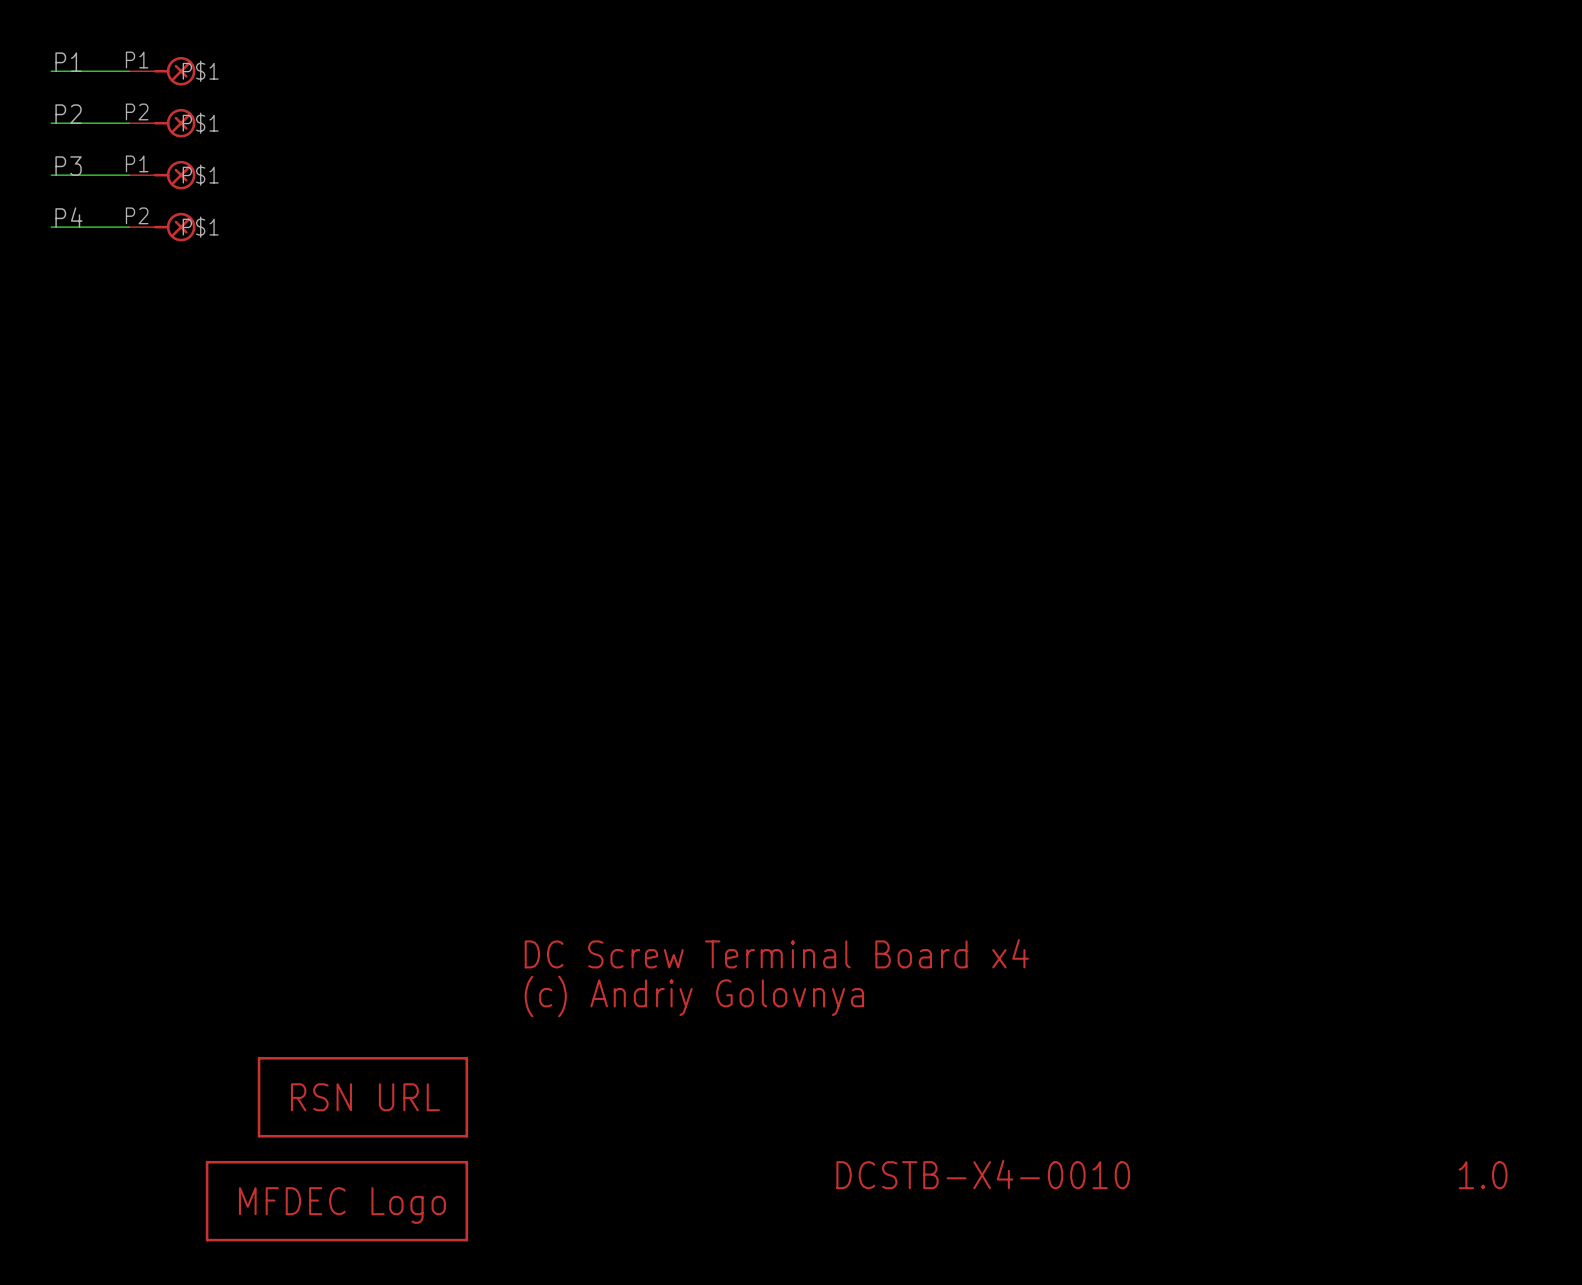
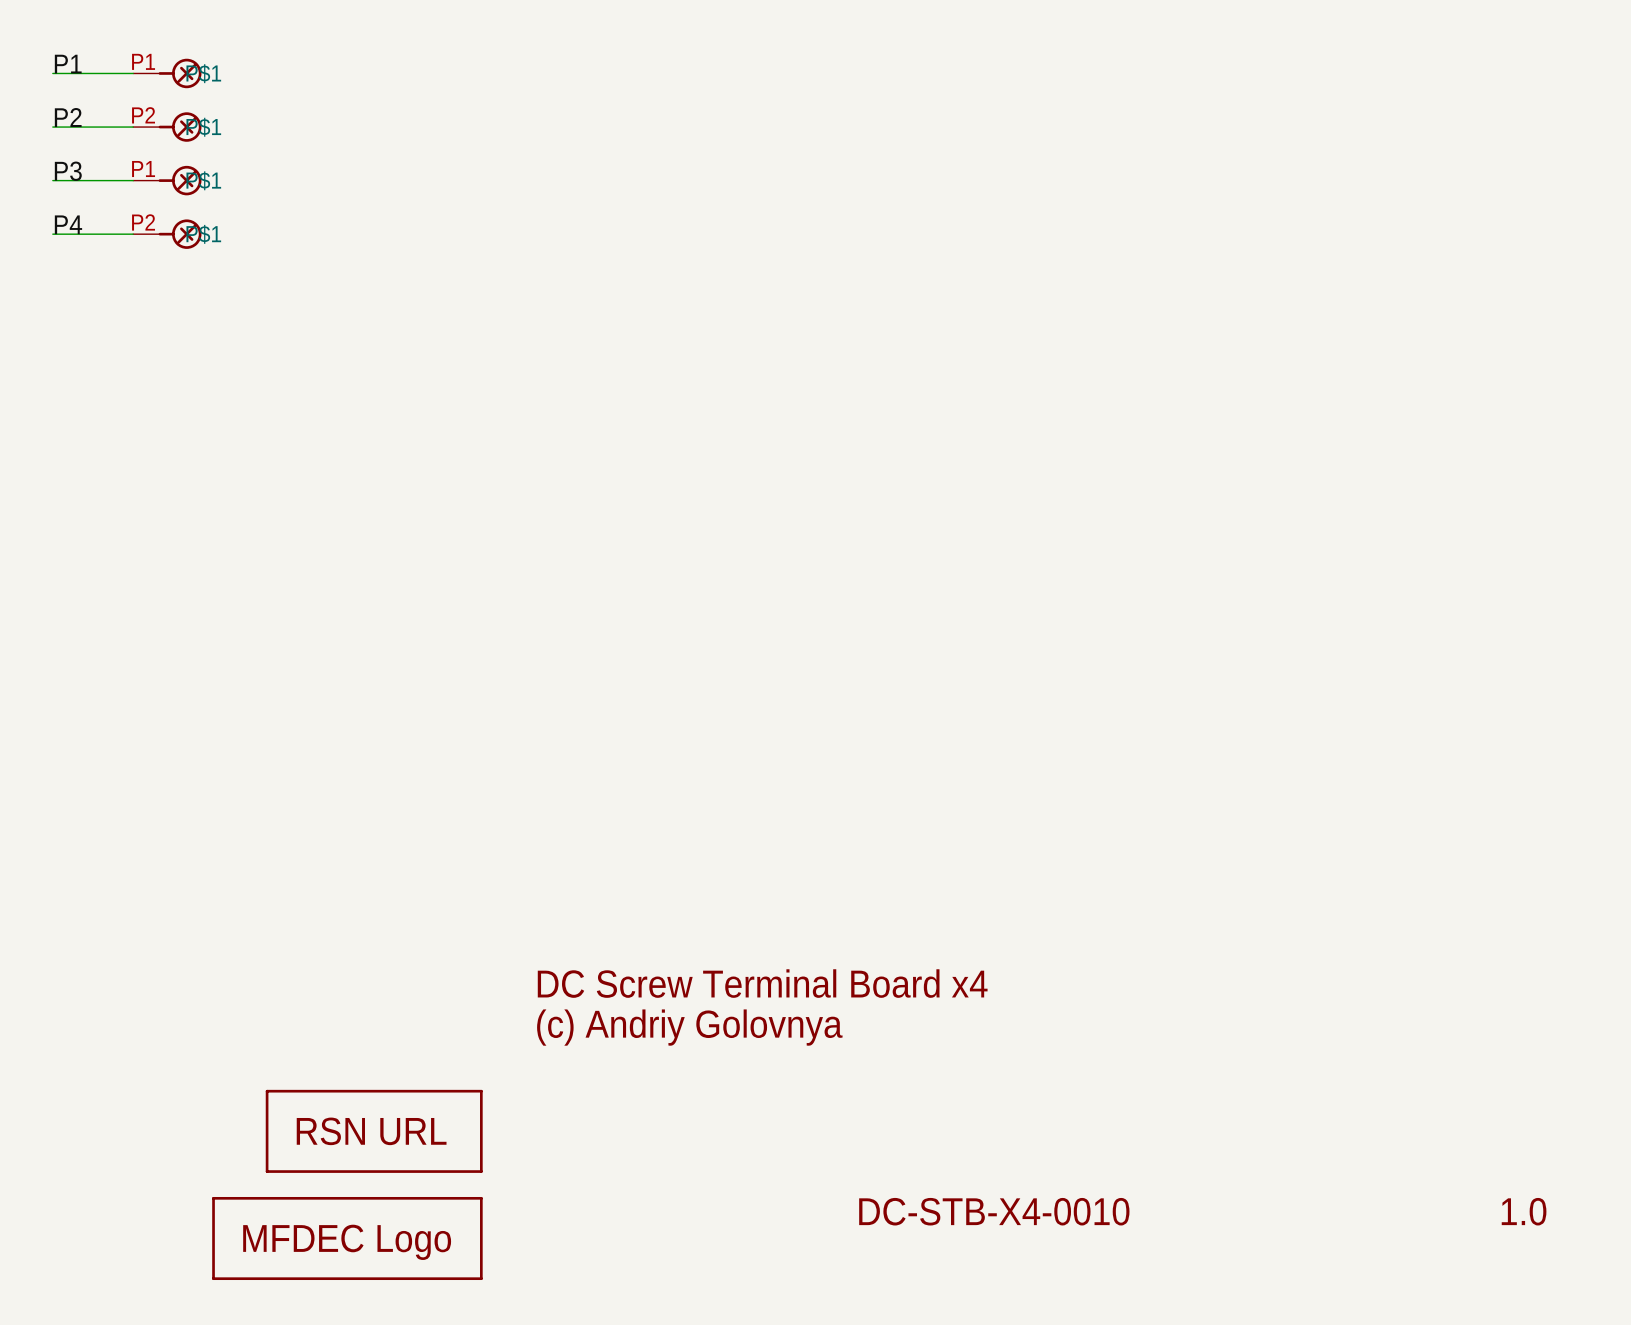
text: DCSTB-X4-0010 (983, 1174) -> DC-STB-X4-0010 (994, 1211)

